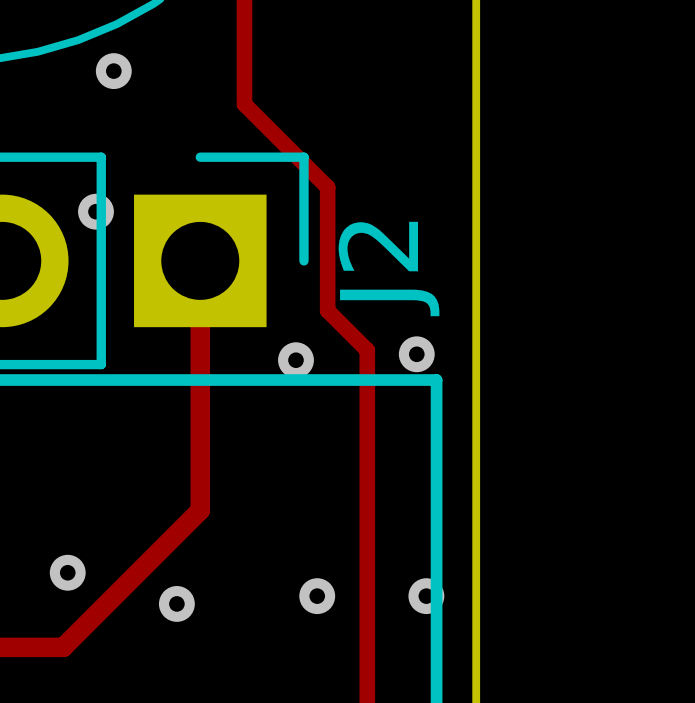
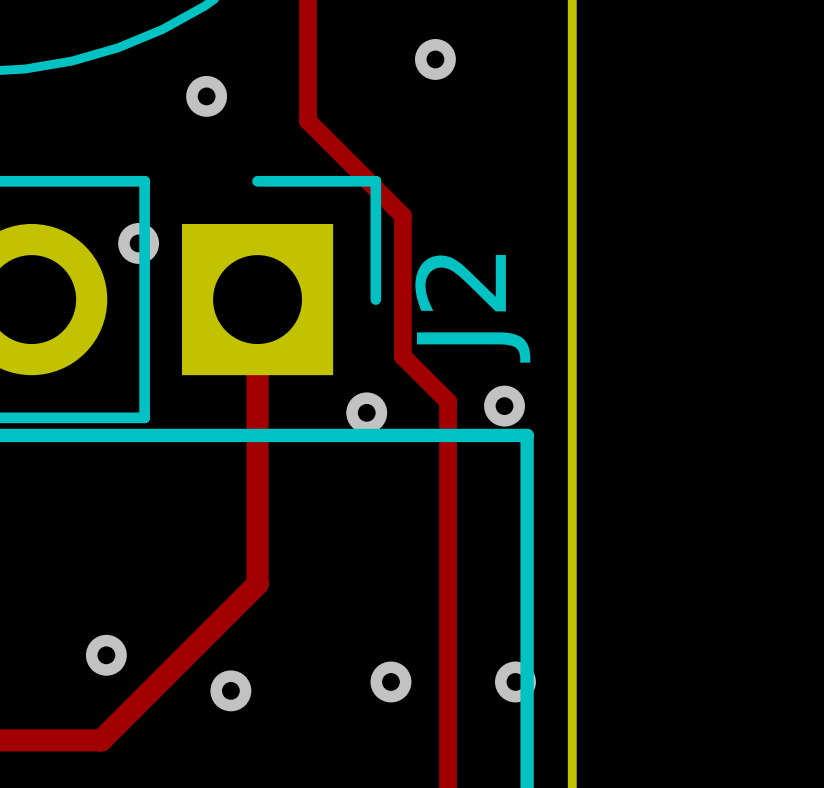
via: none -> (435, 59)
via position: (113, 71) -> (206, 96)

